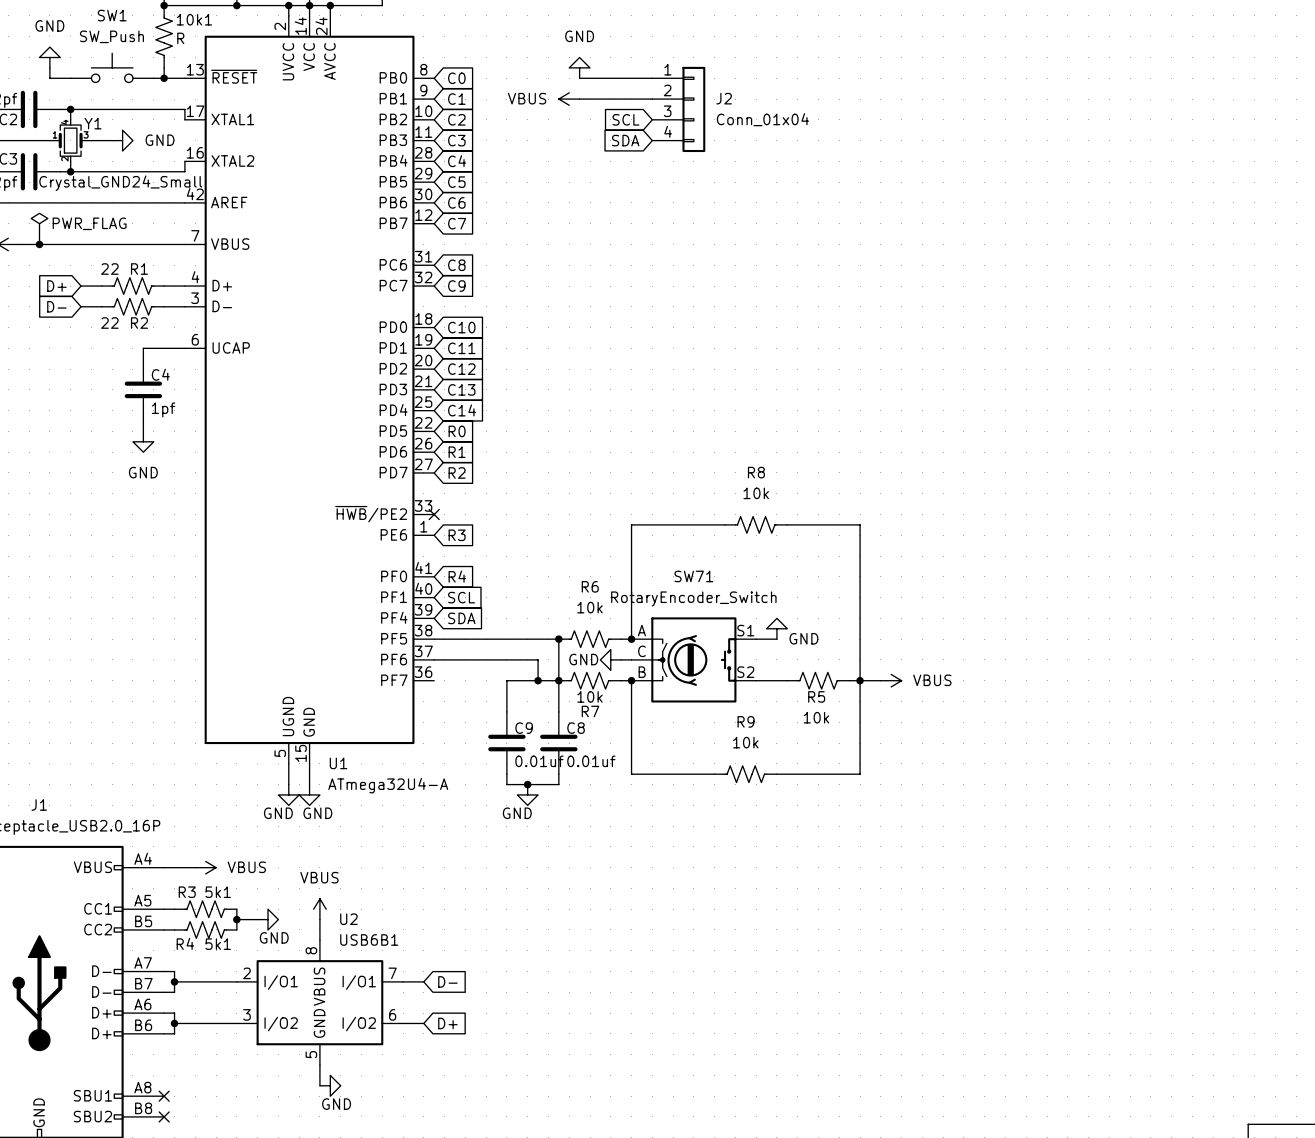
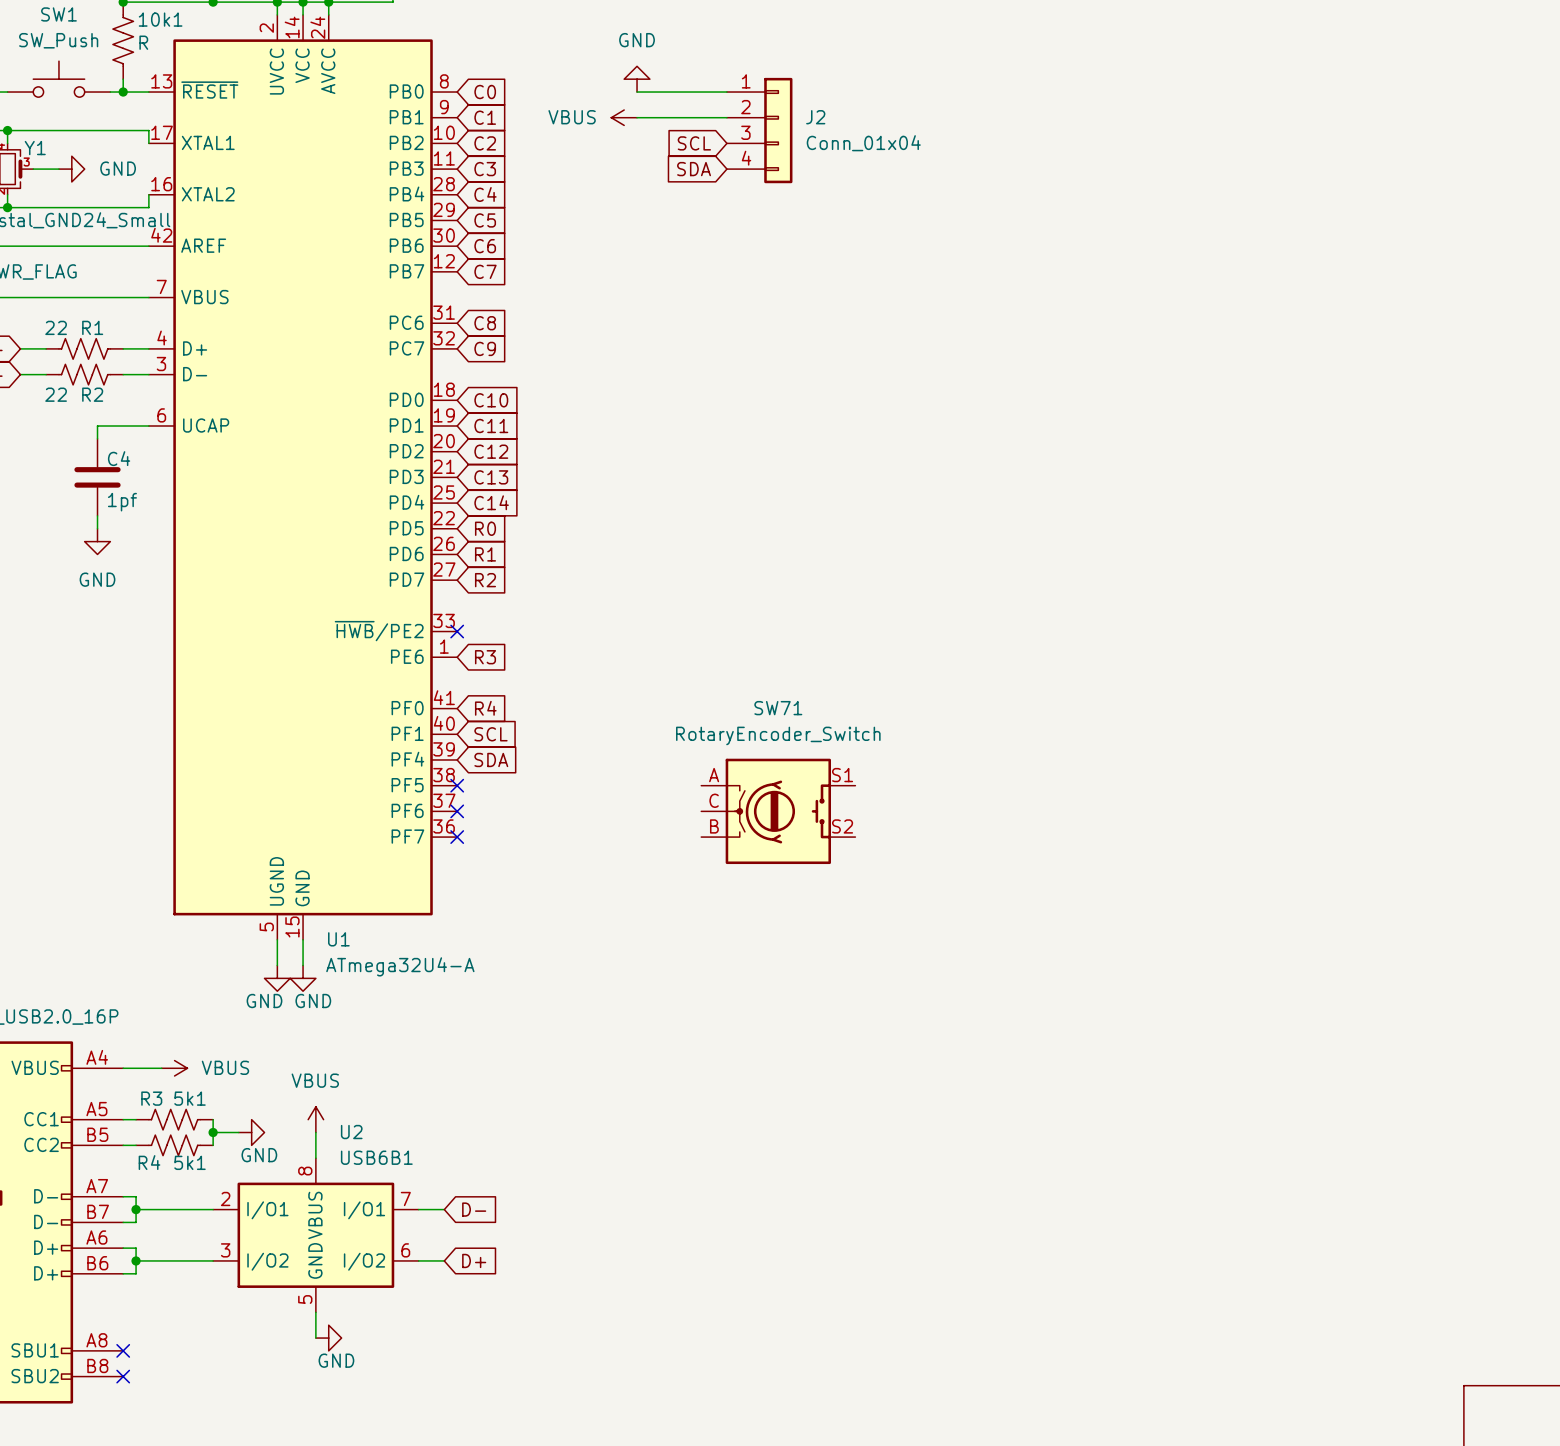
wire: (725, 524) (631, 524) (631, 639) (621, 639) -> none
R8: 10k (756, 524) -> none
wire: (787, 524) (860, 524) (860, 774) (776, 774) -> none
power symbol: GND (776, 628) -> none
wire: (434, 639) (558, 639) (558, 711) -> none
no-connect mark: none -> (457, 785)
junction: (558, 639) -> none
R6: 10k (590, 639) -> none
junction: (631, 639) -> none
wire: (756, 639) (776, 639) -> none
wire: (434, 659) (538, 659) (538, 680) -> none
no-connect mark: none -> (457, 811)
power symbol: GND (610, 659) -> none
wire: (621, 659) (631, 659) -> none
no-connect mark: none -> (457, 837)
junction: (538, 680) -> none
wire: (558, 680) (506, 680) (506, 711) -> none
junction: (558, 680) -> none
R7: 10k (590, 680) -> none
wire: (621, 680) (631, 680) (631, 774) (714, 774) -> none
junction: (631, 680) -> none
wire: (756, 680) (787, 680) -> none
R5: 10k (818, 680) -> none
wire: (849, 680) (880, 680) -> none
junction: (860, 680) -> none
power symbol: VBUS (891, 680) -> none
C9: 0.01uf (506, 743) -> none
C8: 0.01uf (558, 743) -> none
wire: (506, 774) (506, 784) (558, 784) (558, 774) -> none
R9: 10k (745, 774) -> none
junction: (527, 784) -> none
power symbol: GND (527, 794) -> none

